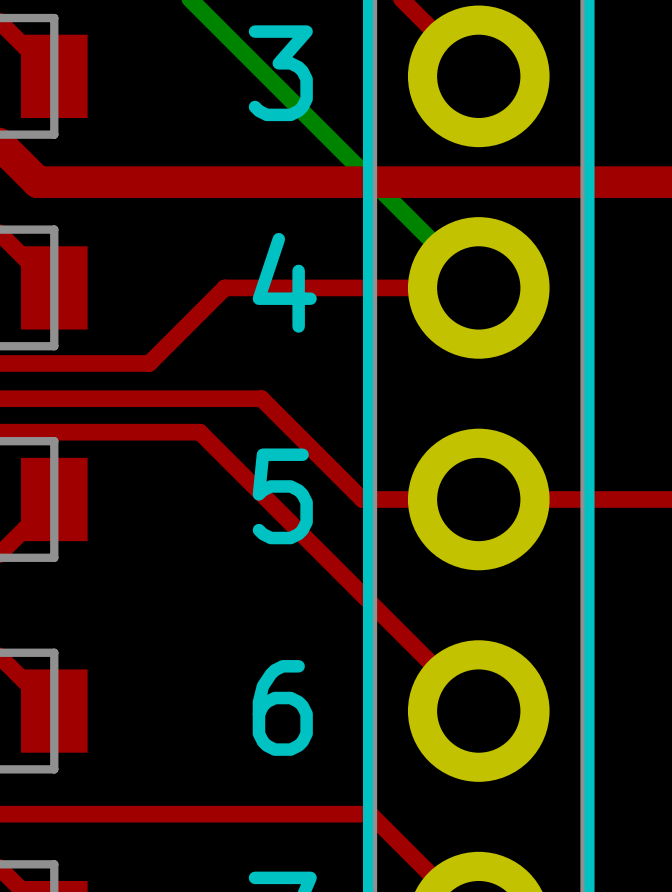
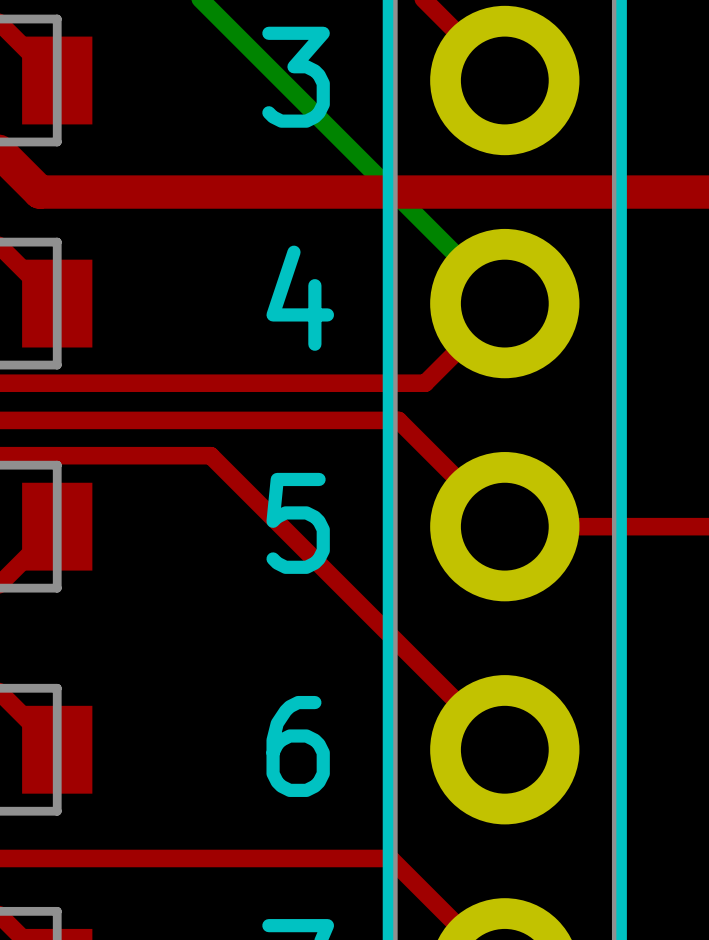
top track: (478, 287) (224, 287) (149, 363) -> (504, 303) (425, 383) (157, 383)
top track: (261, 398) (362, 499) (478, 499) -> (275, 420) (398, 420) (504, 526)

